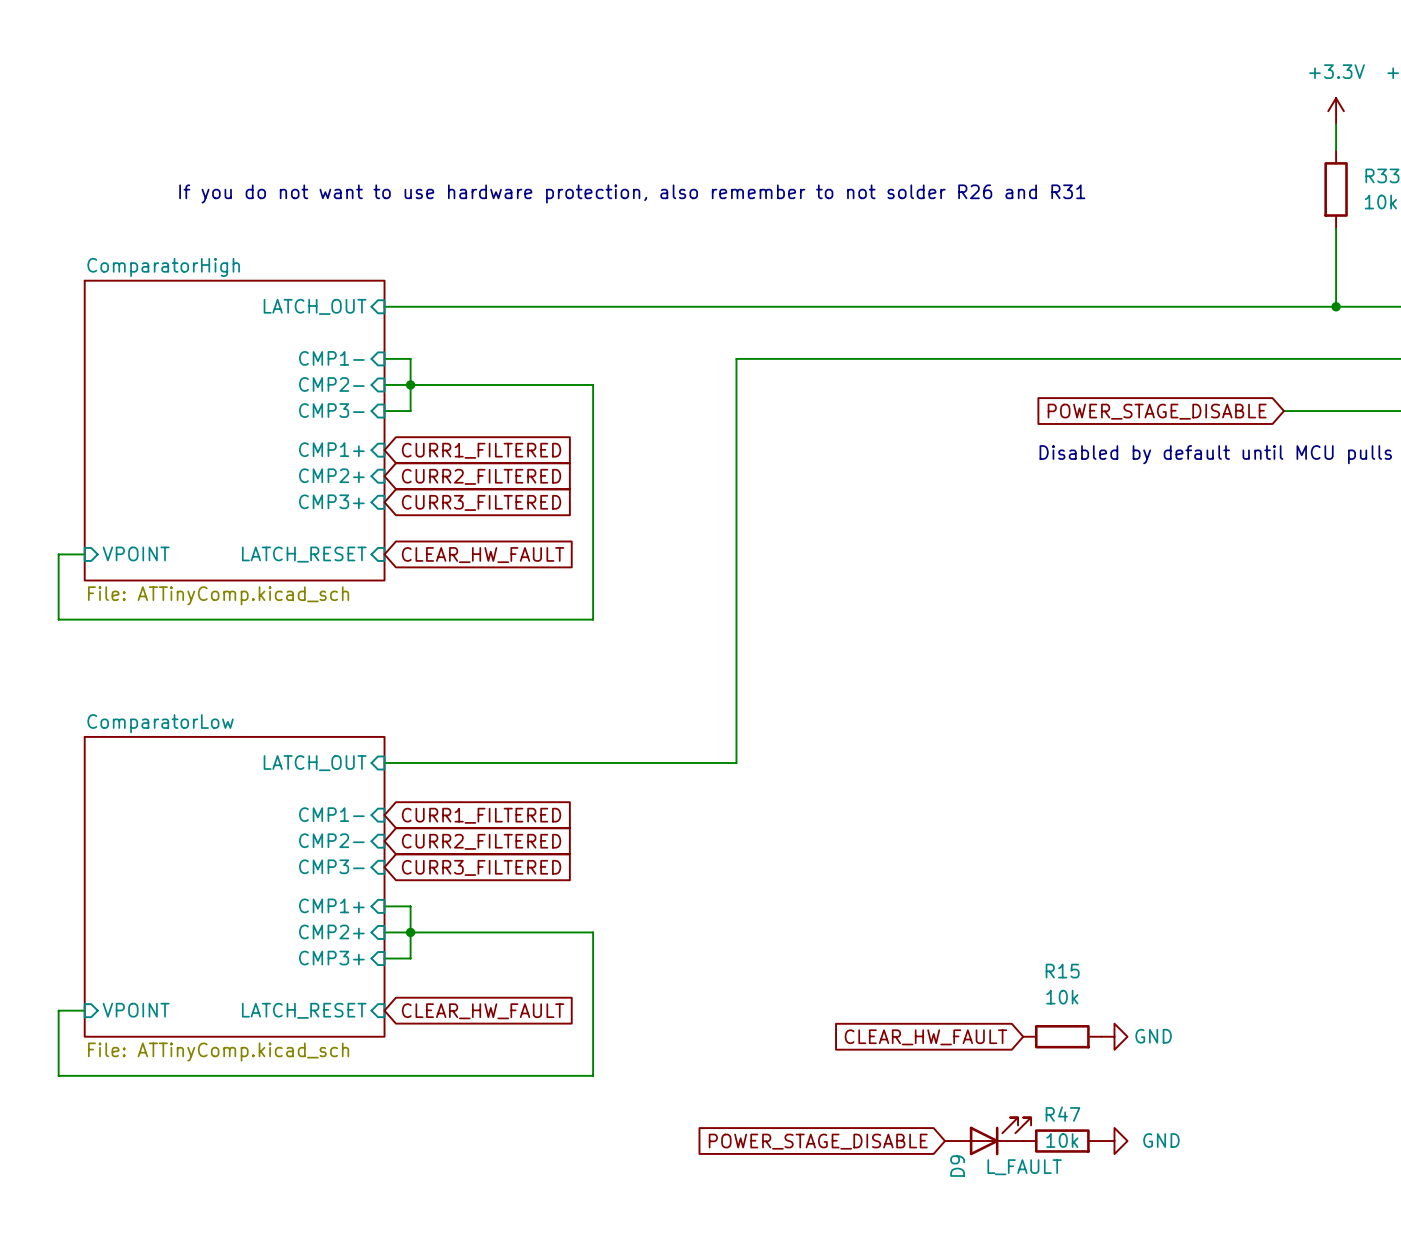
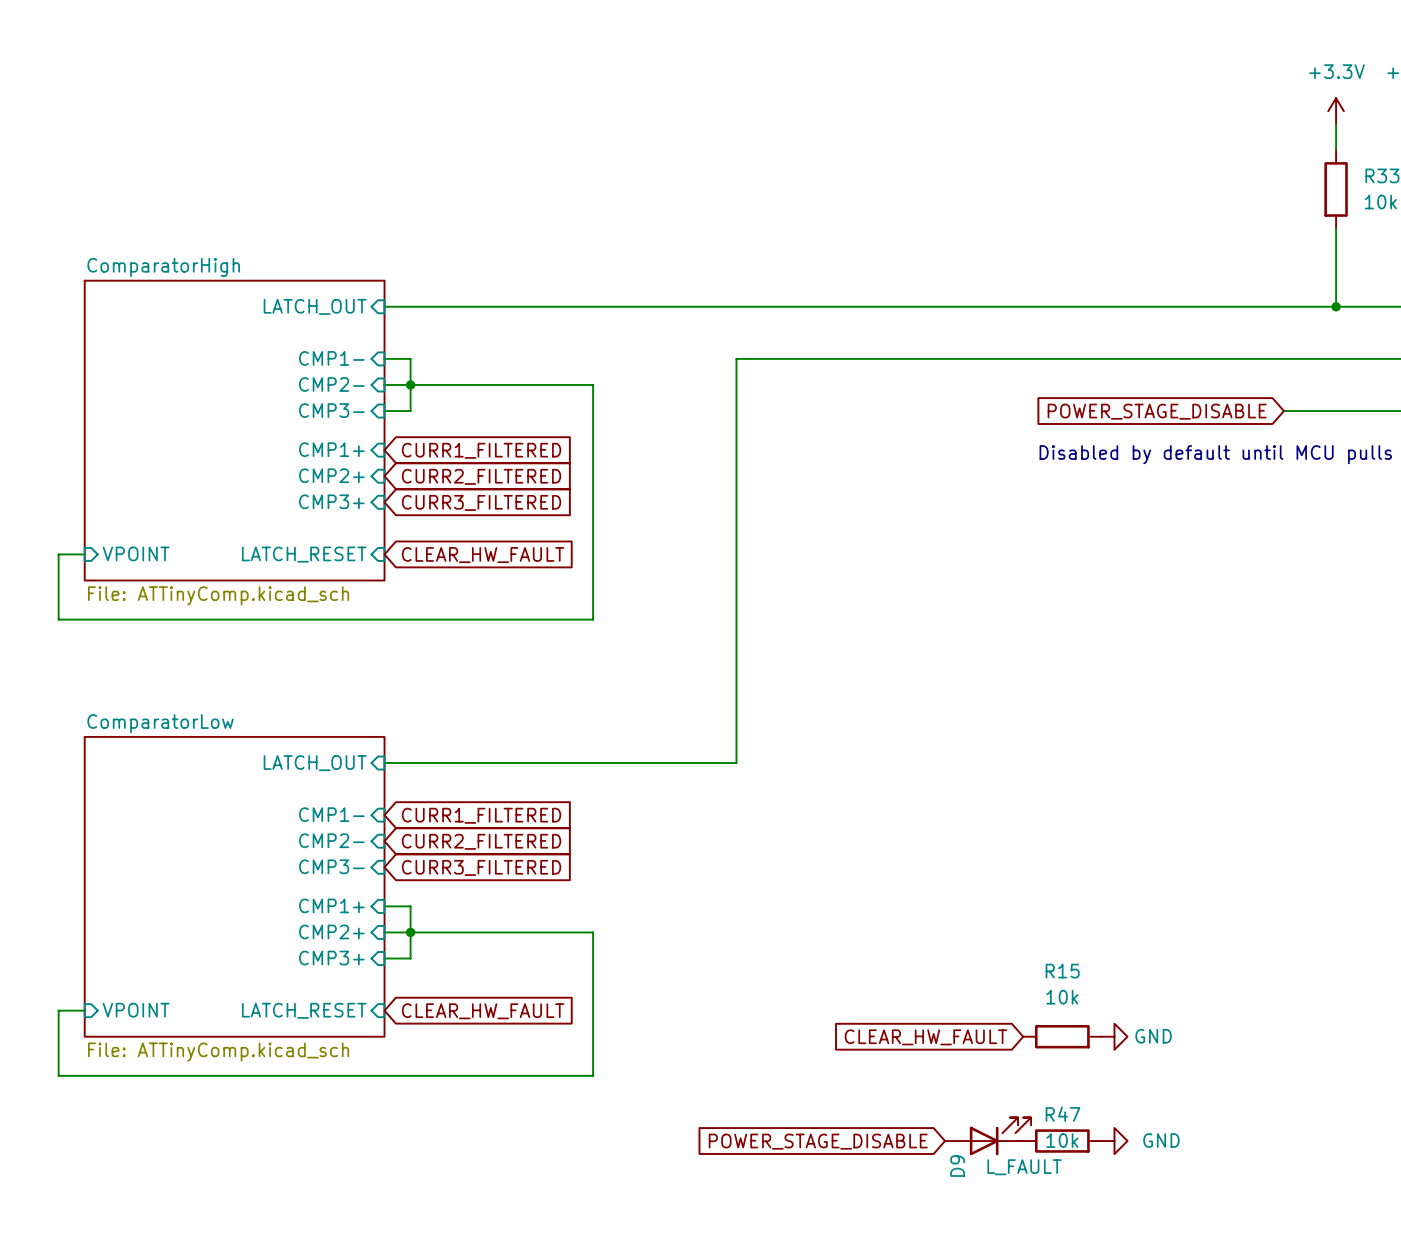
text: If you do not want to use hardware protection, also remember to not solder R26 and R31 (632, 193) -> none

